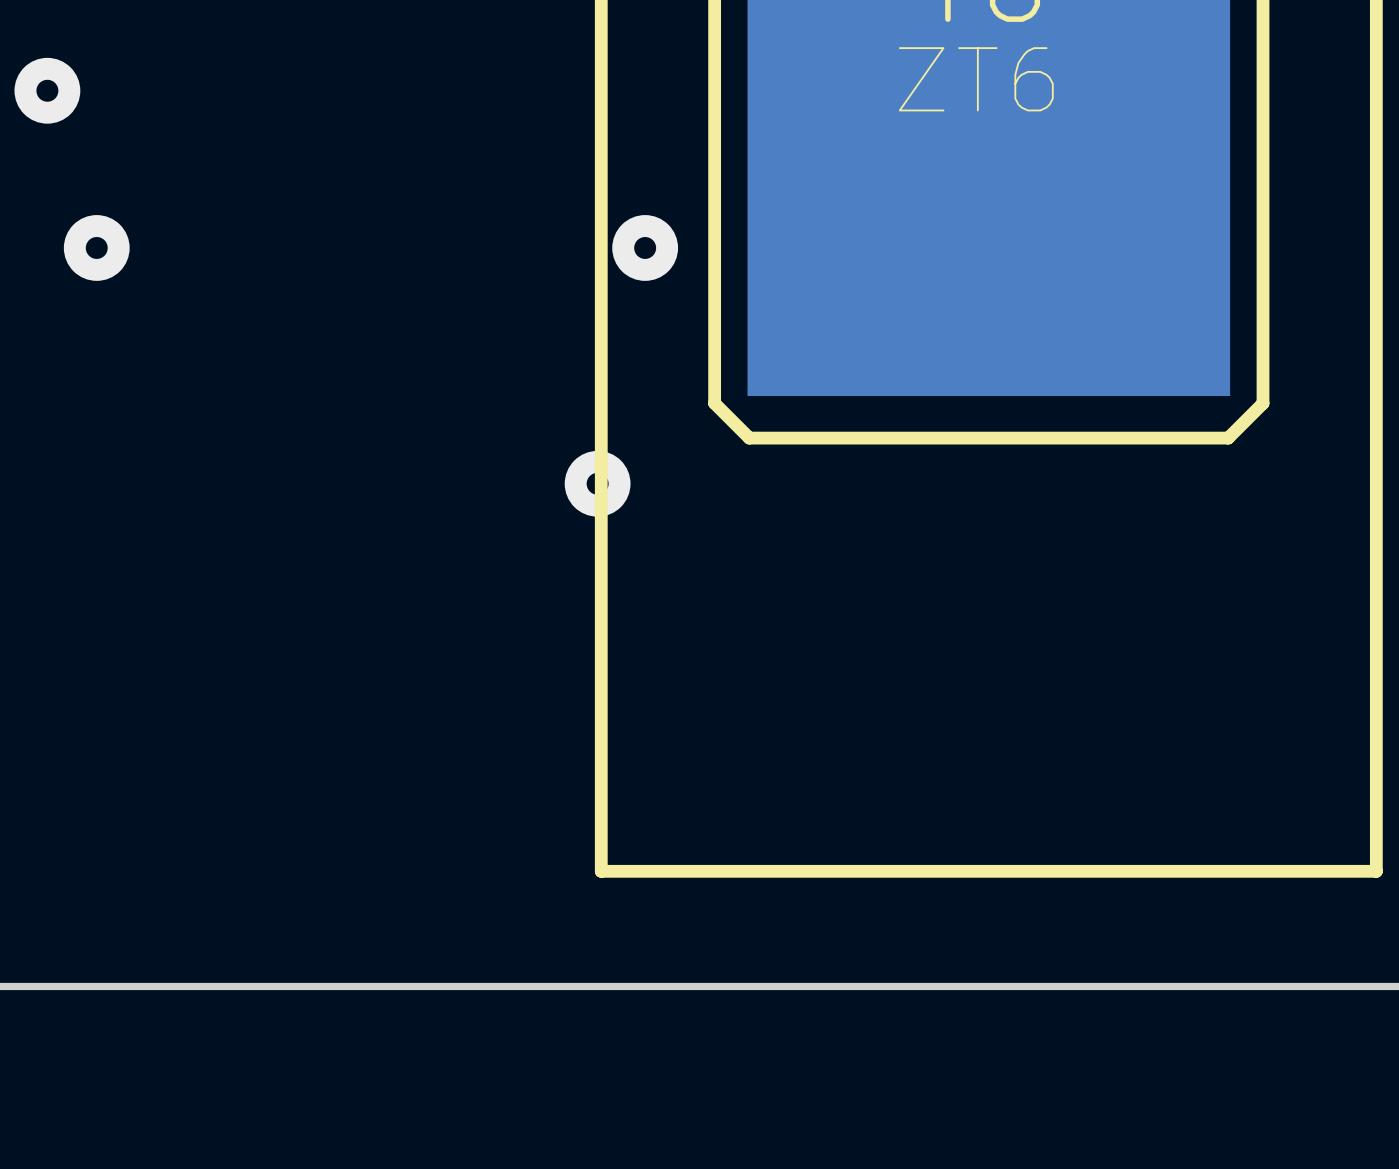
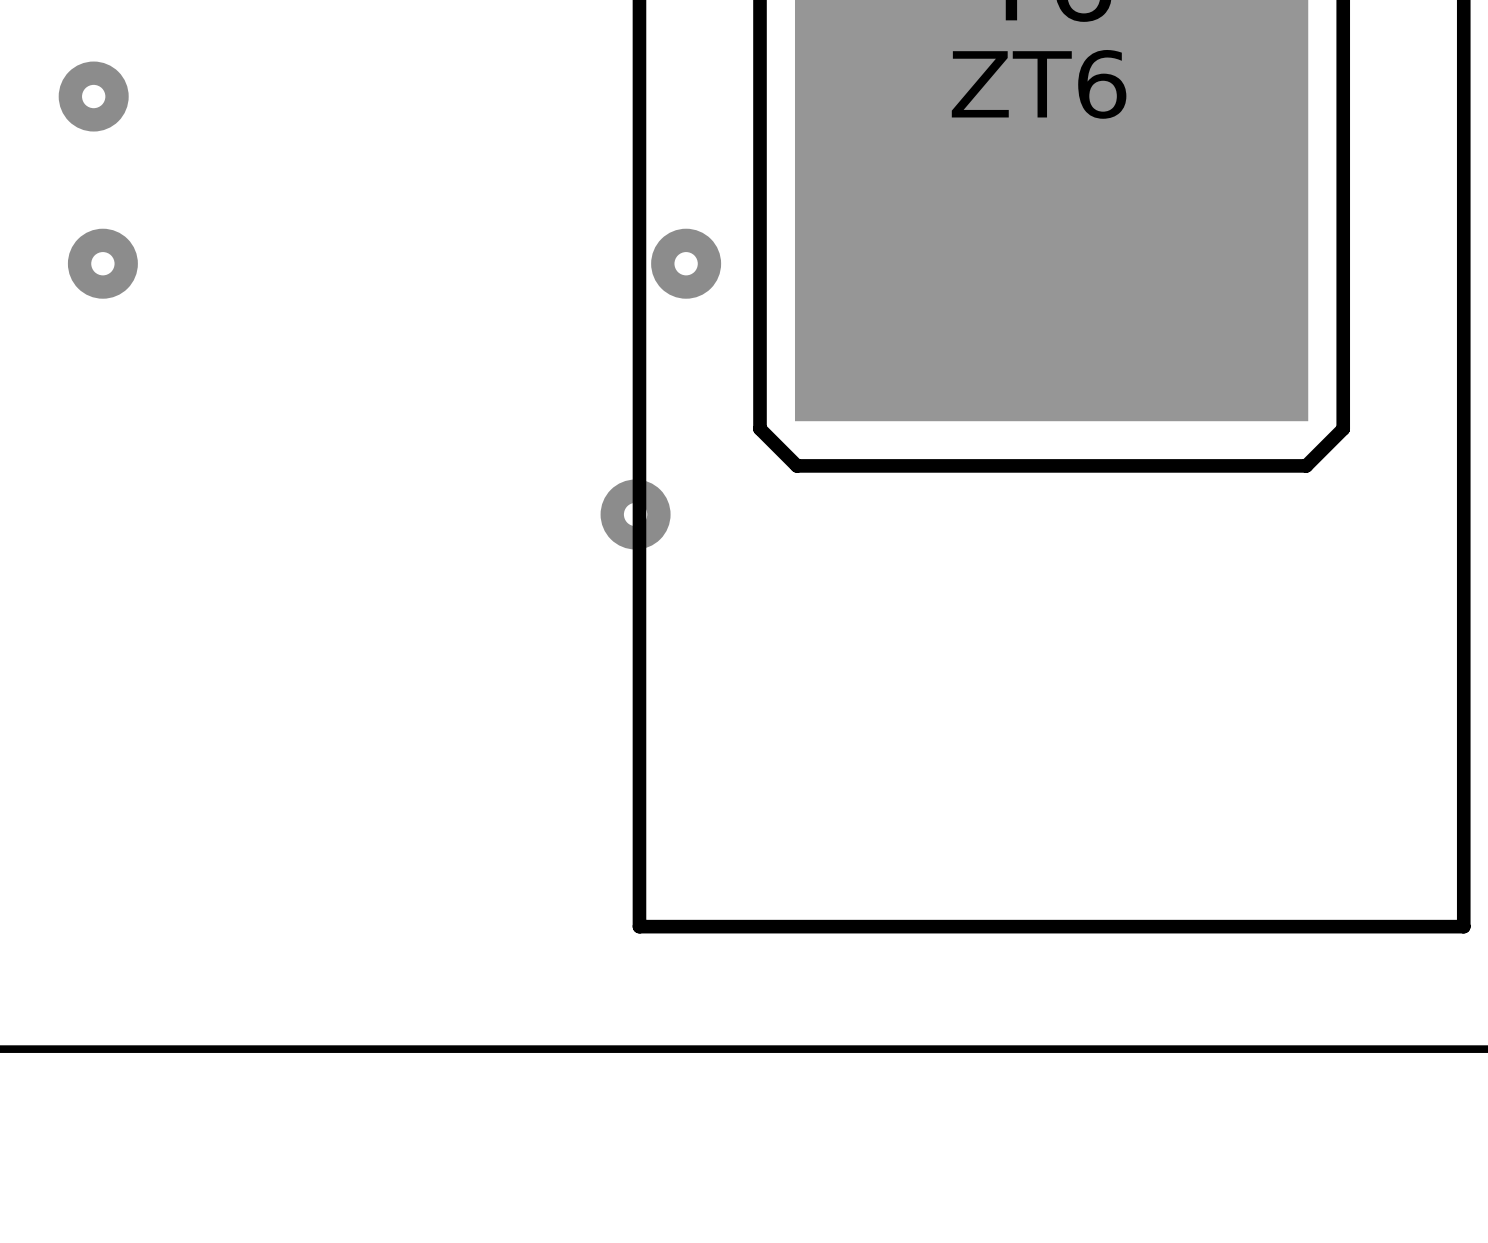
via position: (47, 90) -> (93, 96)

